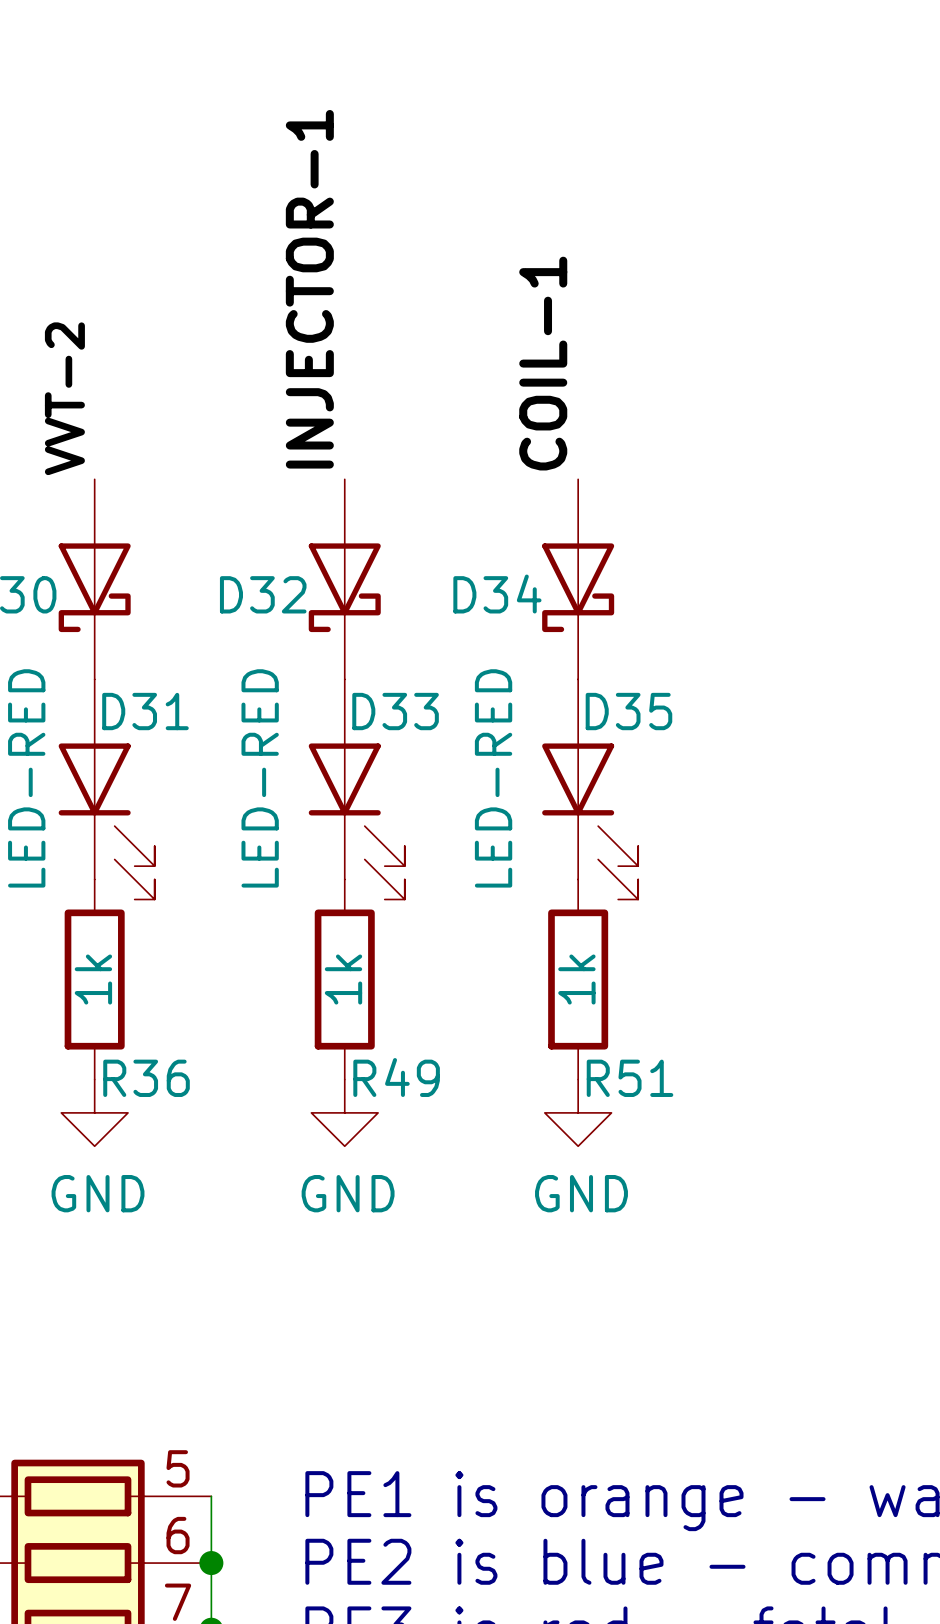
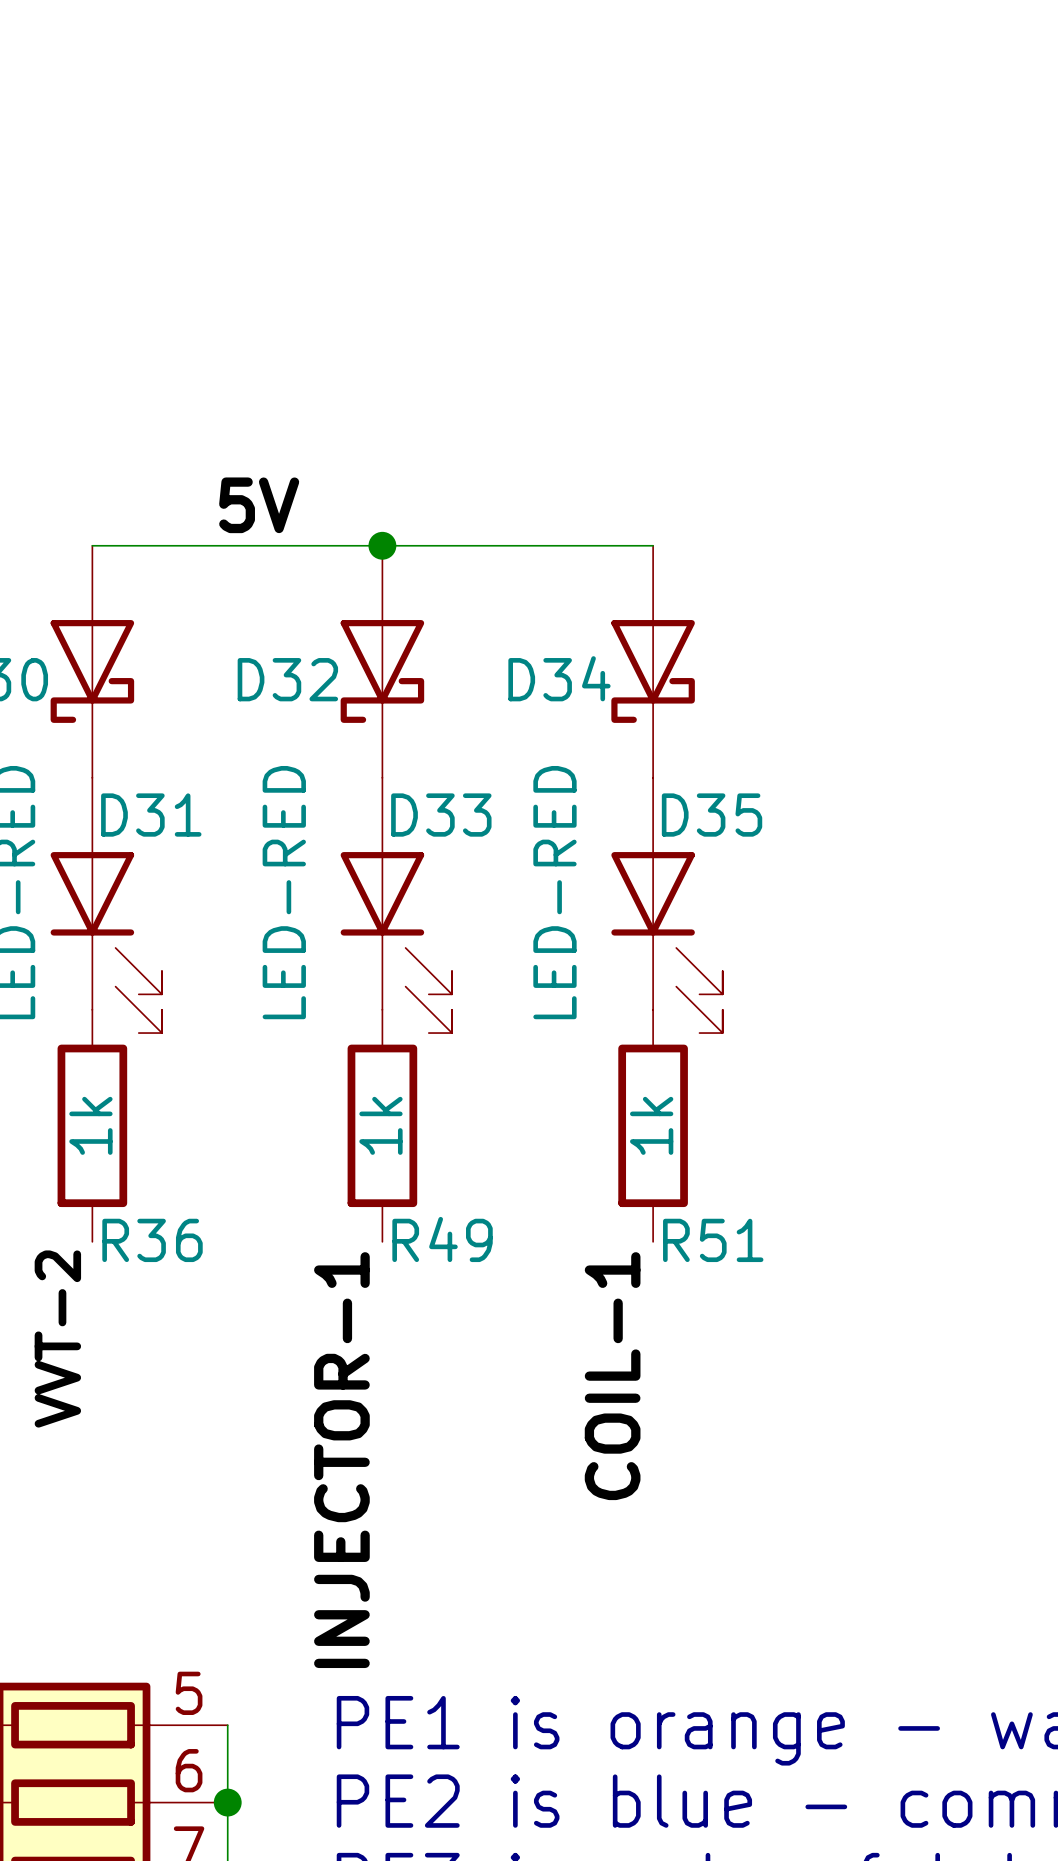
label position: INJECTOR-1 (309, 289) -> INJECTOR-1 (341, 1460)
label position: COIL-1 (543, 363) -> COIL-1 (612, 1376)
label position: VVT-2 (64, 398) -> VVT-2 (57, 1339)
label: none -> 5V (259, 505)
wire: none -> (92, 545) (653, 545)
junction: none -> (382, 545)
power symbol: GND (94, 1112) -> none
power symbol: GND (344, 1112) -> none
power symbol: GND (578, 1112) -> none

